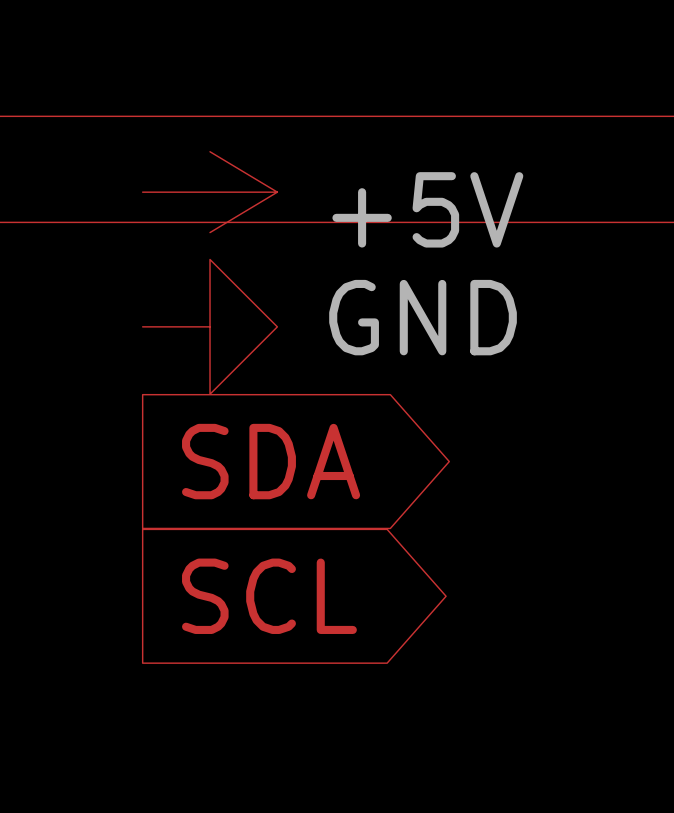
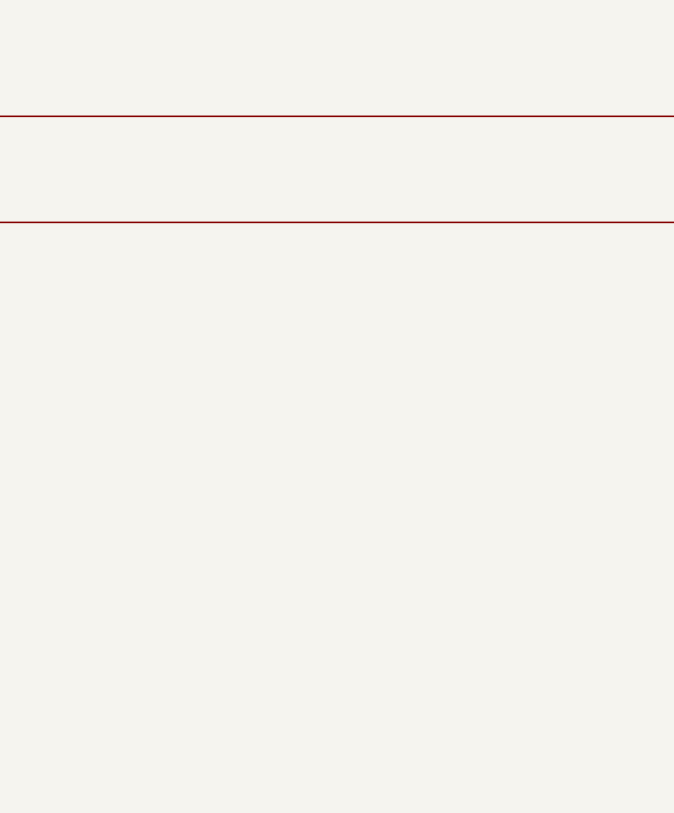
power symbol: +5V (210, 192) -> none
power symbol: GND (210, 326) -> none
global label: SDA (271, 461) -> none
global label: SCL (269, 596) -> none

